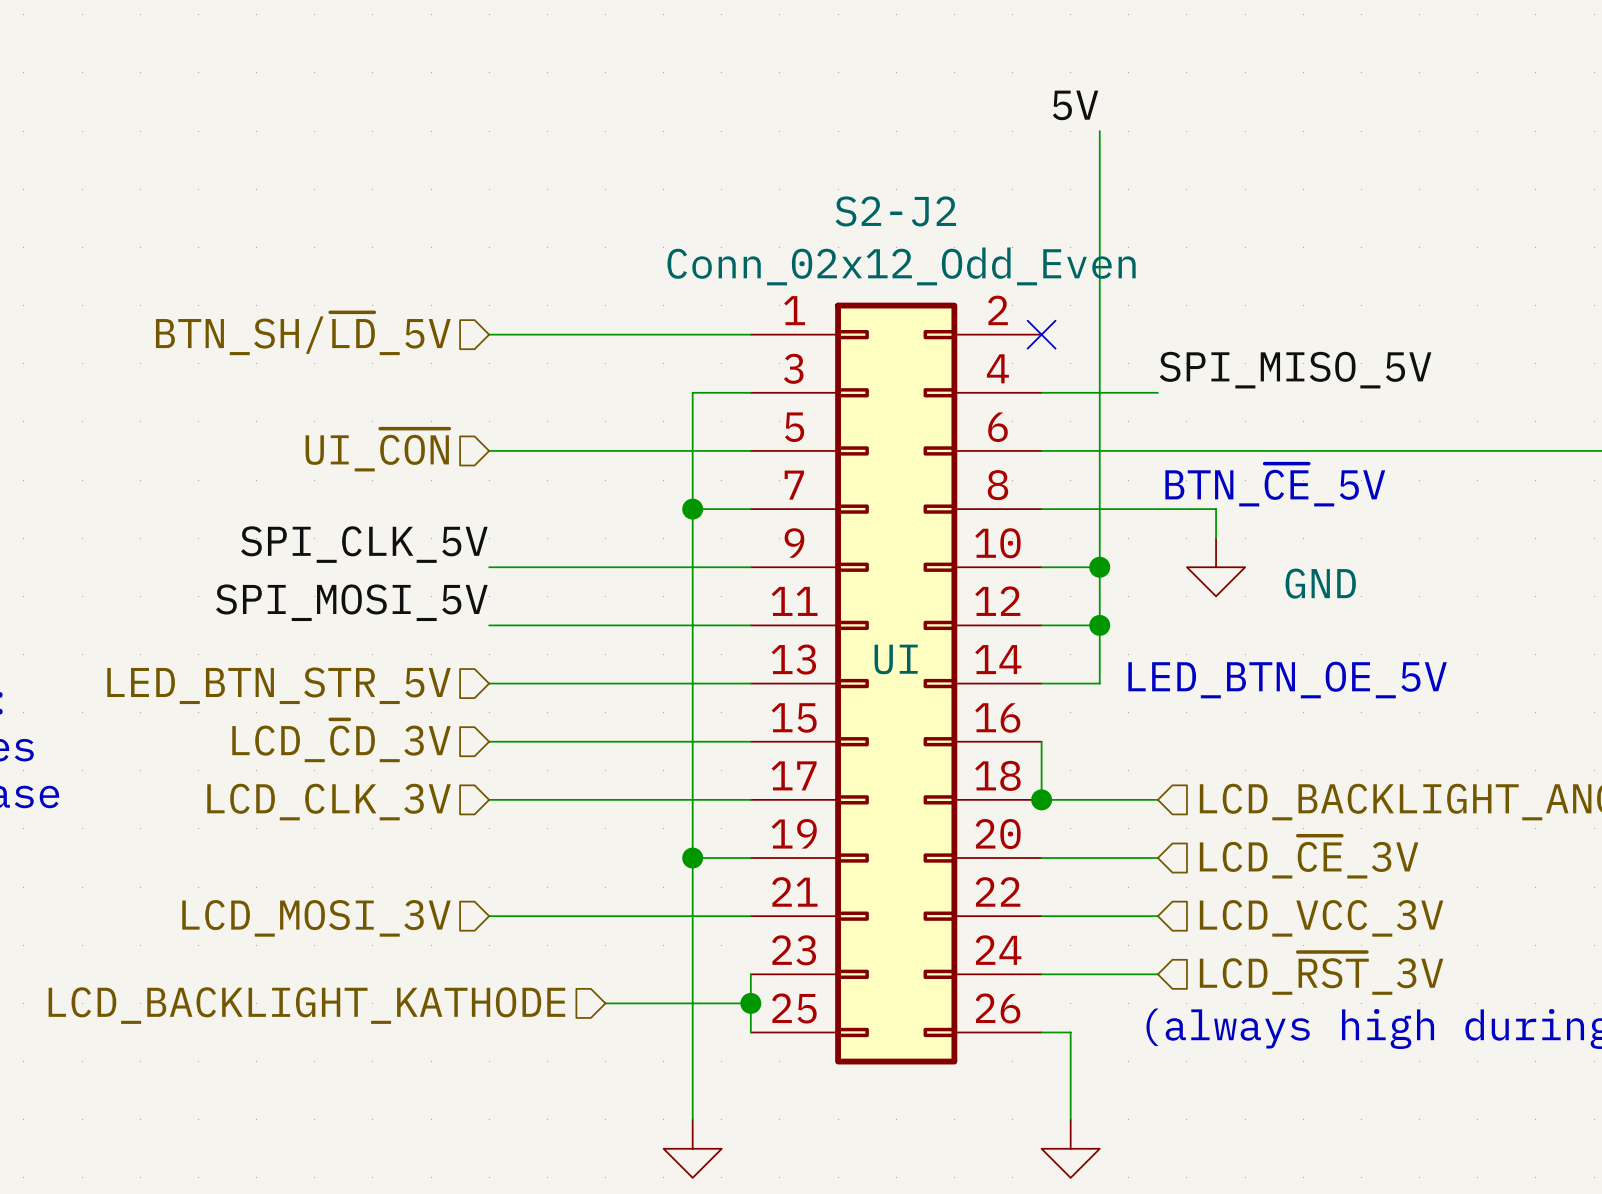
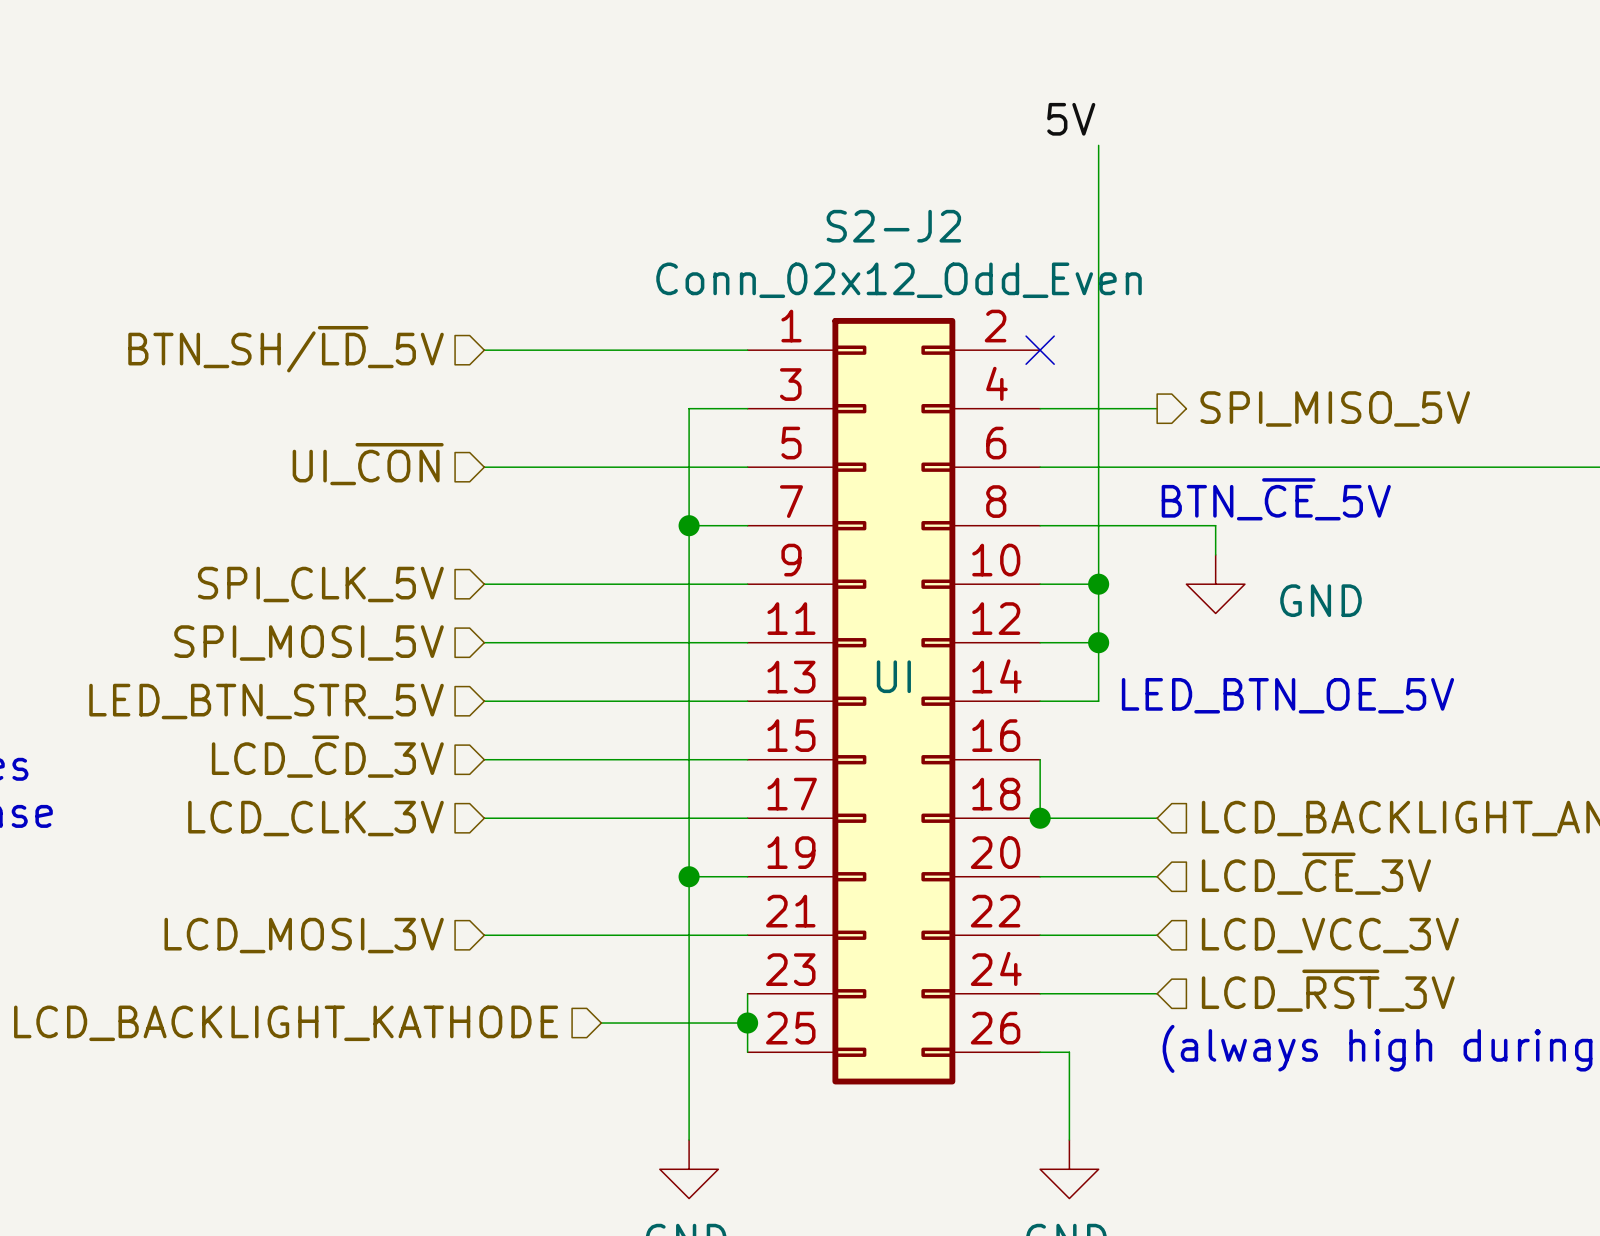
label: SPI_MISO_5V (1295, 370) -> none
hierarchical label: none -> SPI_MISO_5V (1335, 408)
label: SPI_CLK_5V (364, 544) -> none
hierarchical label: none -> SPI_CLK_5V (320, 584)
label: SPI_MOSI_5V (351, 602) -> none
hierarchical label: none -> SPI_MOSI_5V (309, 643)

